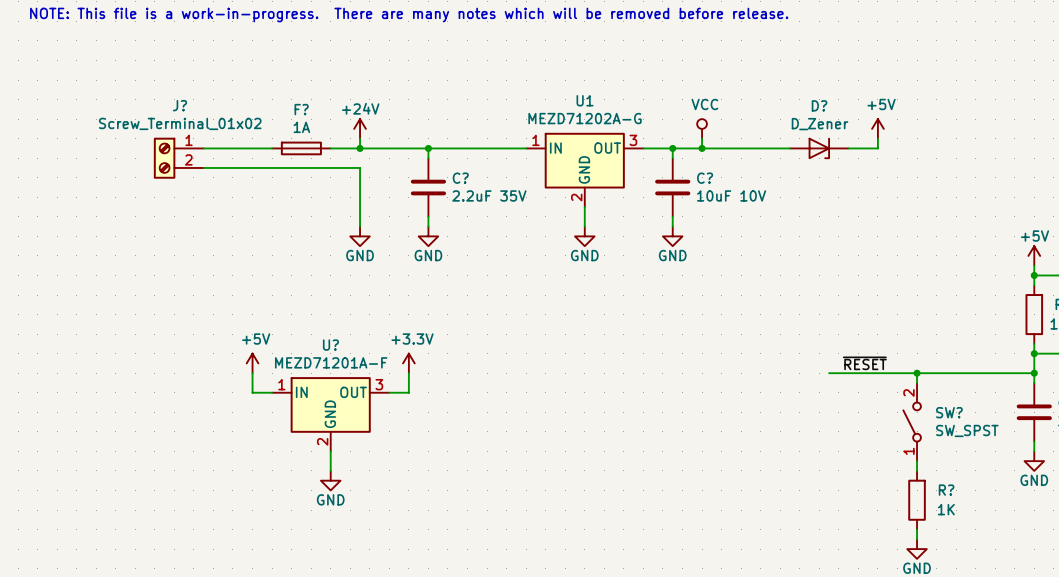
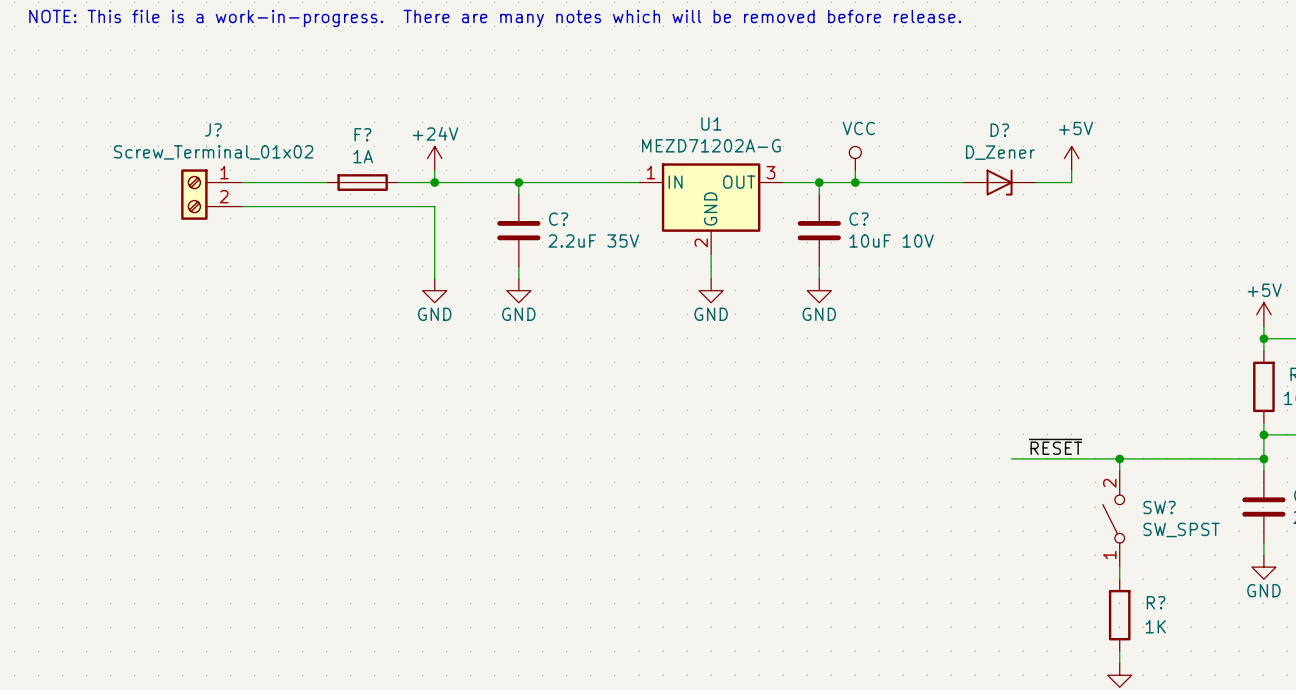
power symbol: +5V (252, 363) -> none
power symbol: +3.3V (408, 363) -> none
wire: (252, 373) (252, 392) (272, 392) -> none
wire: (408, 373) (408, 392) (389, 392) -> none
U?: MEZD71201A-F (330, 414) -> none
wire: (330, 451) (330, 470) -> none
power symbol: GND (330, 480) -> none

